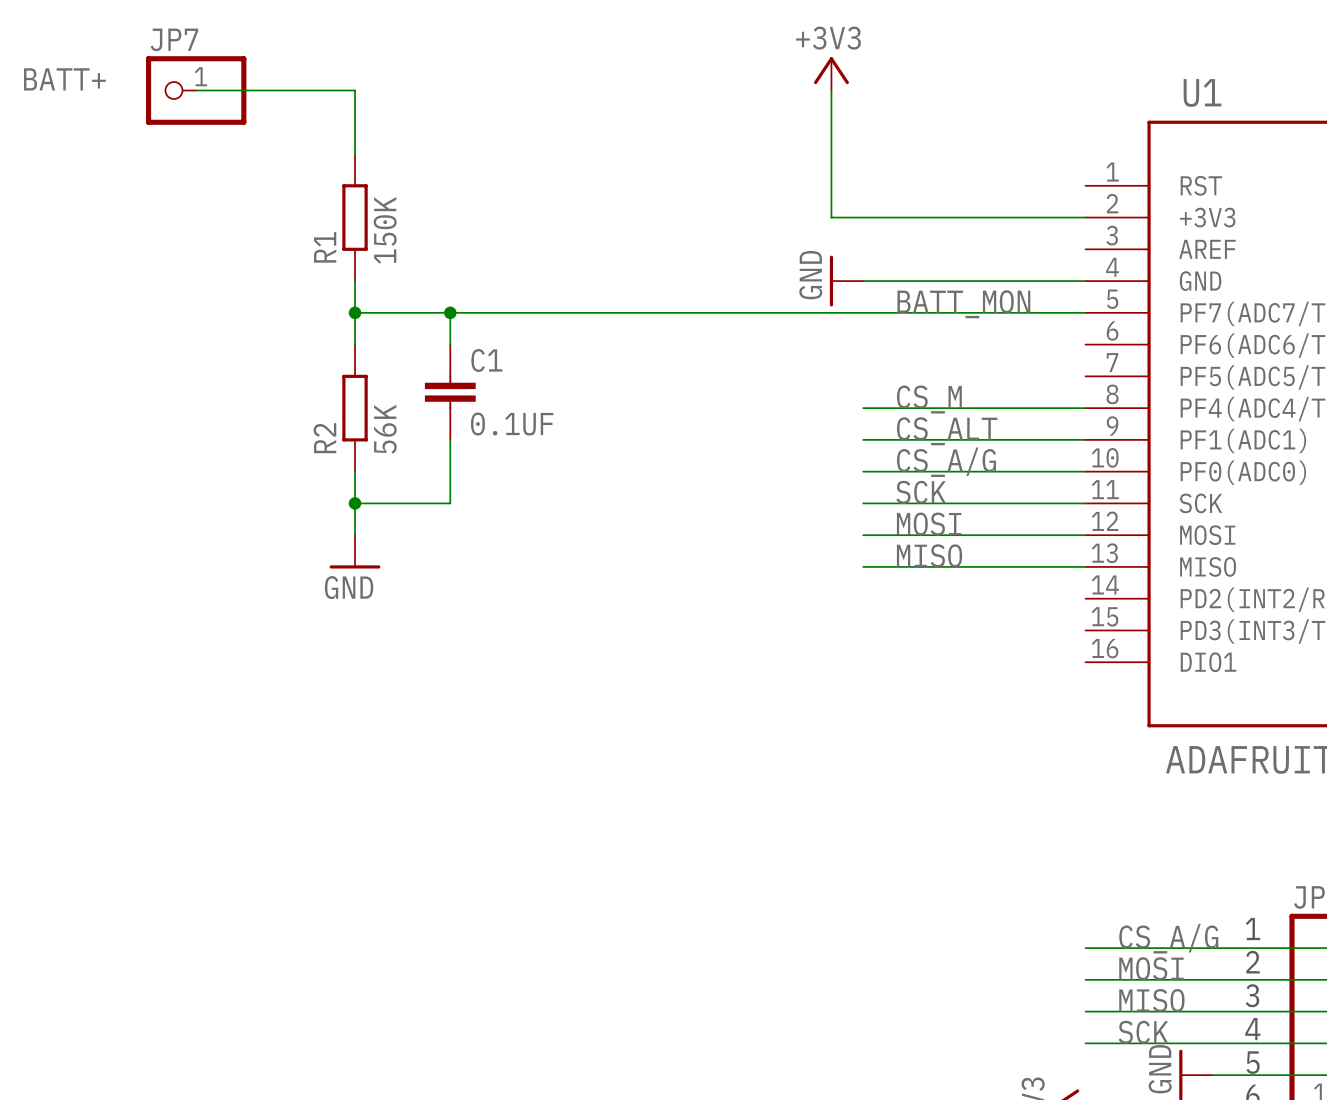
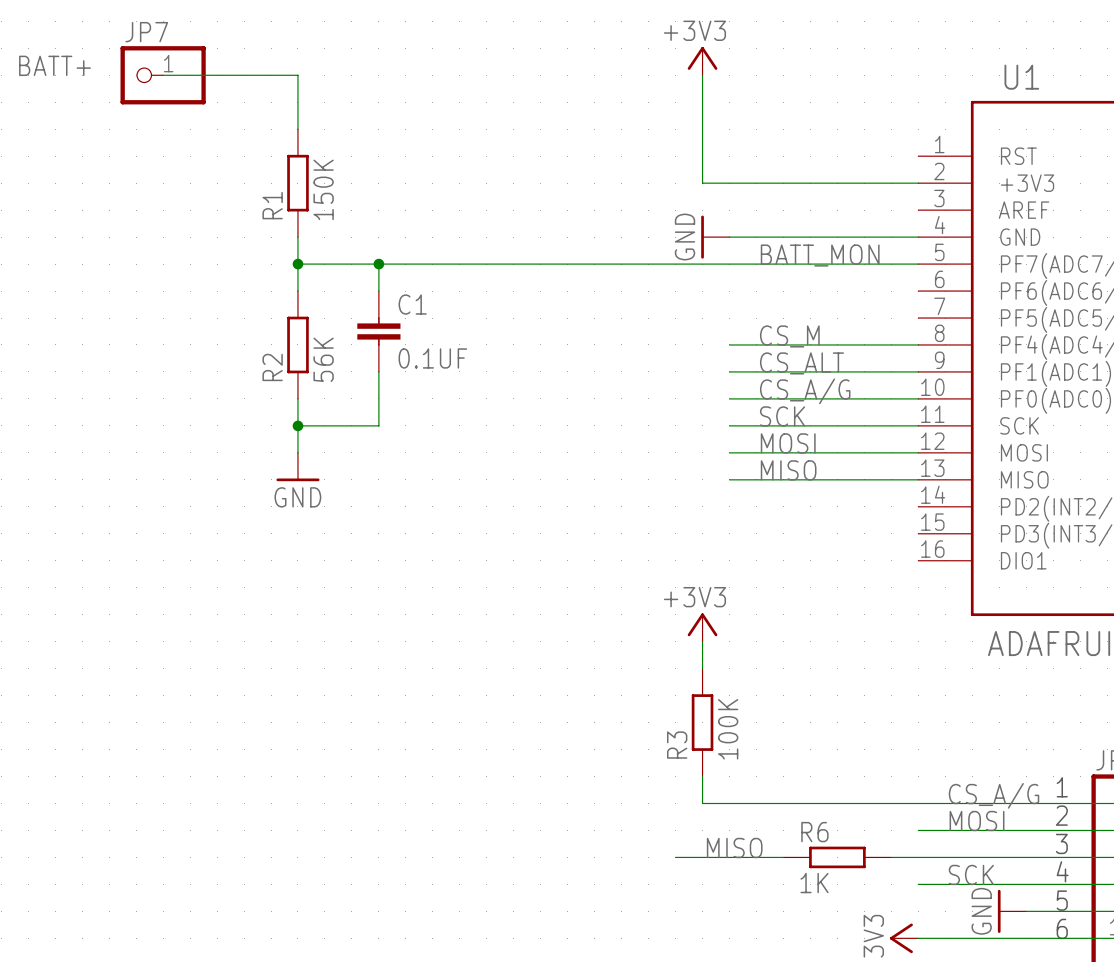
power symbol: none -> +3V3 (702, 627)
wire: none -> (702, 641) (702, 668)
R3: none -> 100K (702, 722)
wire: none -> (702, 776) (702, 803) (918, 803)
label position: MISO (1151, 1000) -> MISO (734, 847)
wire: none -> (675, 857) (783, 857)
R6: none -> 1K (837, 857)
wire: none -> (891, 857) (918, 857)

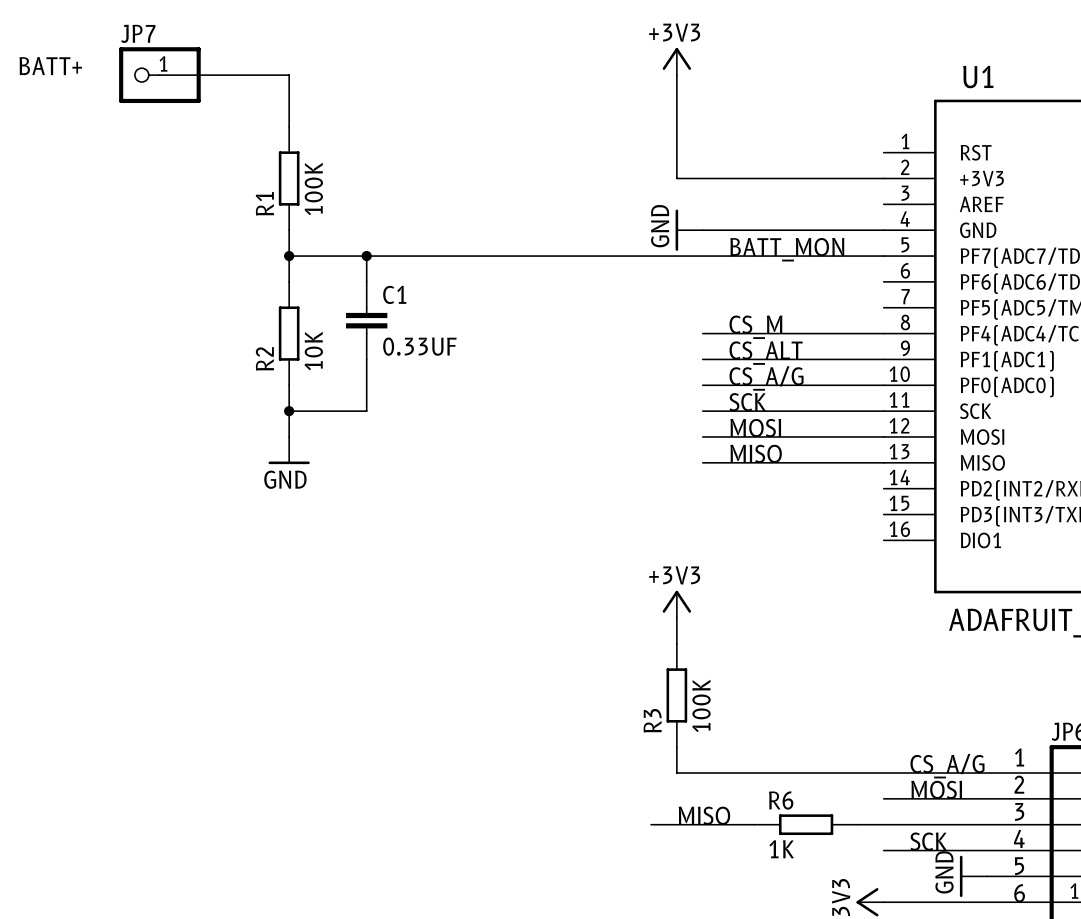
R1 value: 150K (323, 189) -> 100K (313, 188)
C1 value: 0.1UF (432, 358) -> 0.33UF (419, 346)
R2 value: 56K (323, 359) -> 10K (313, 351)

